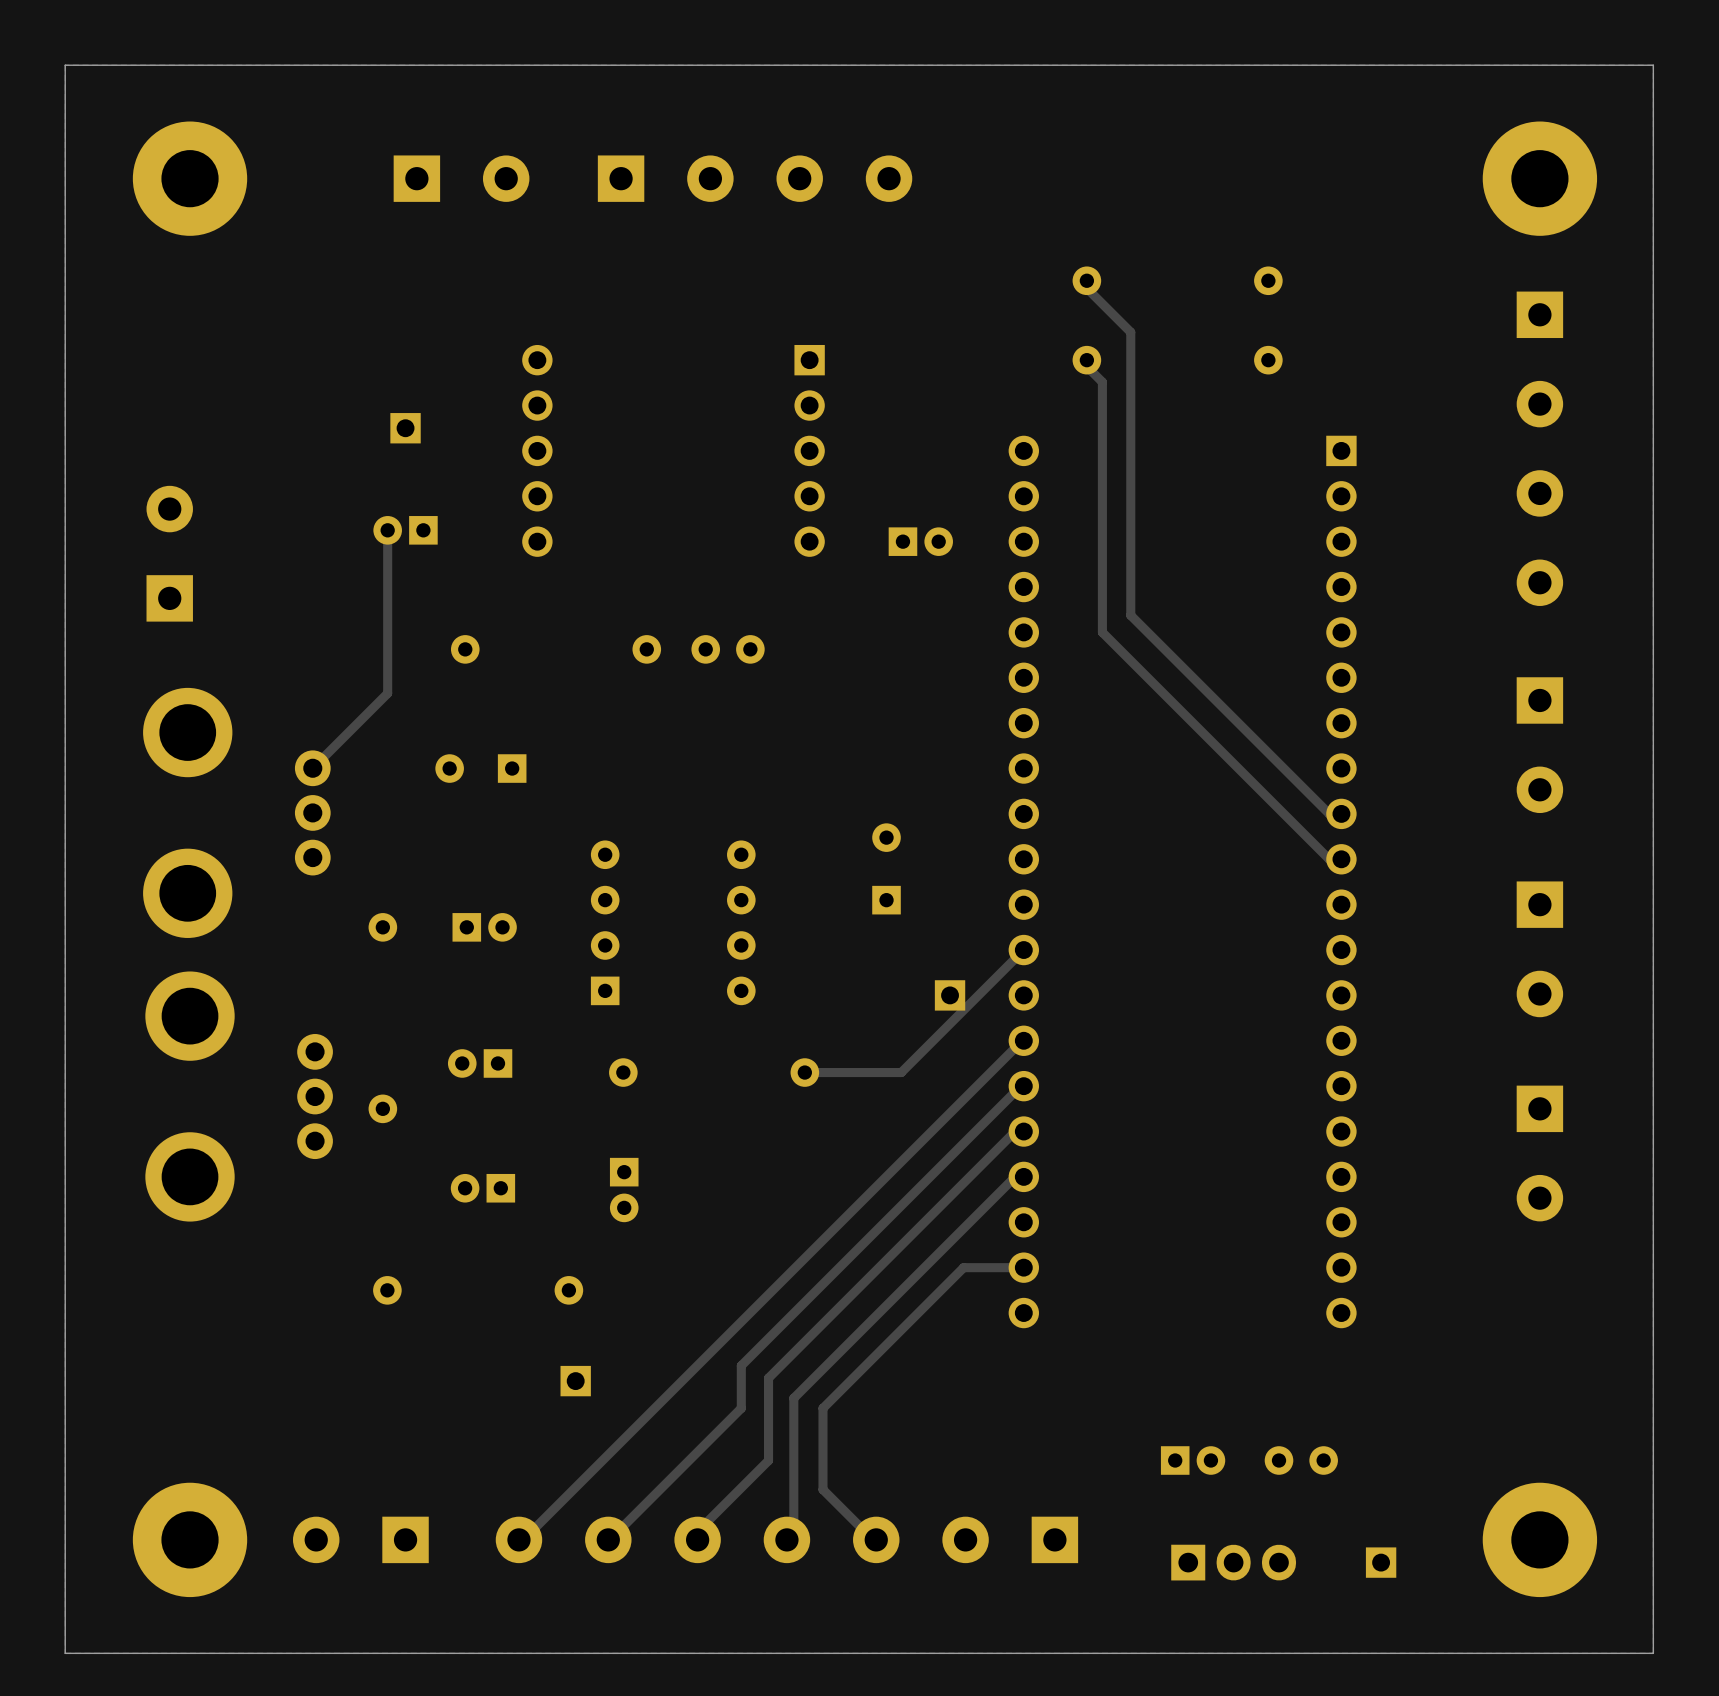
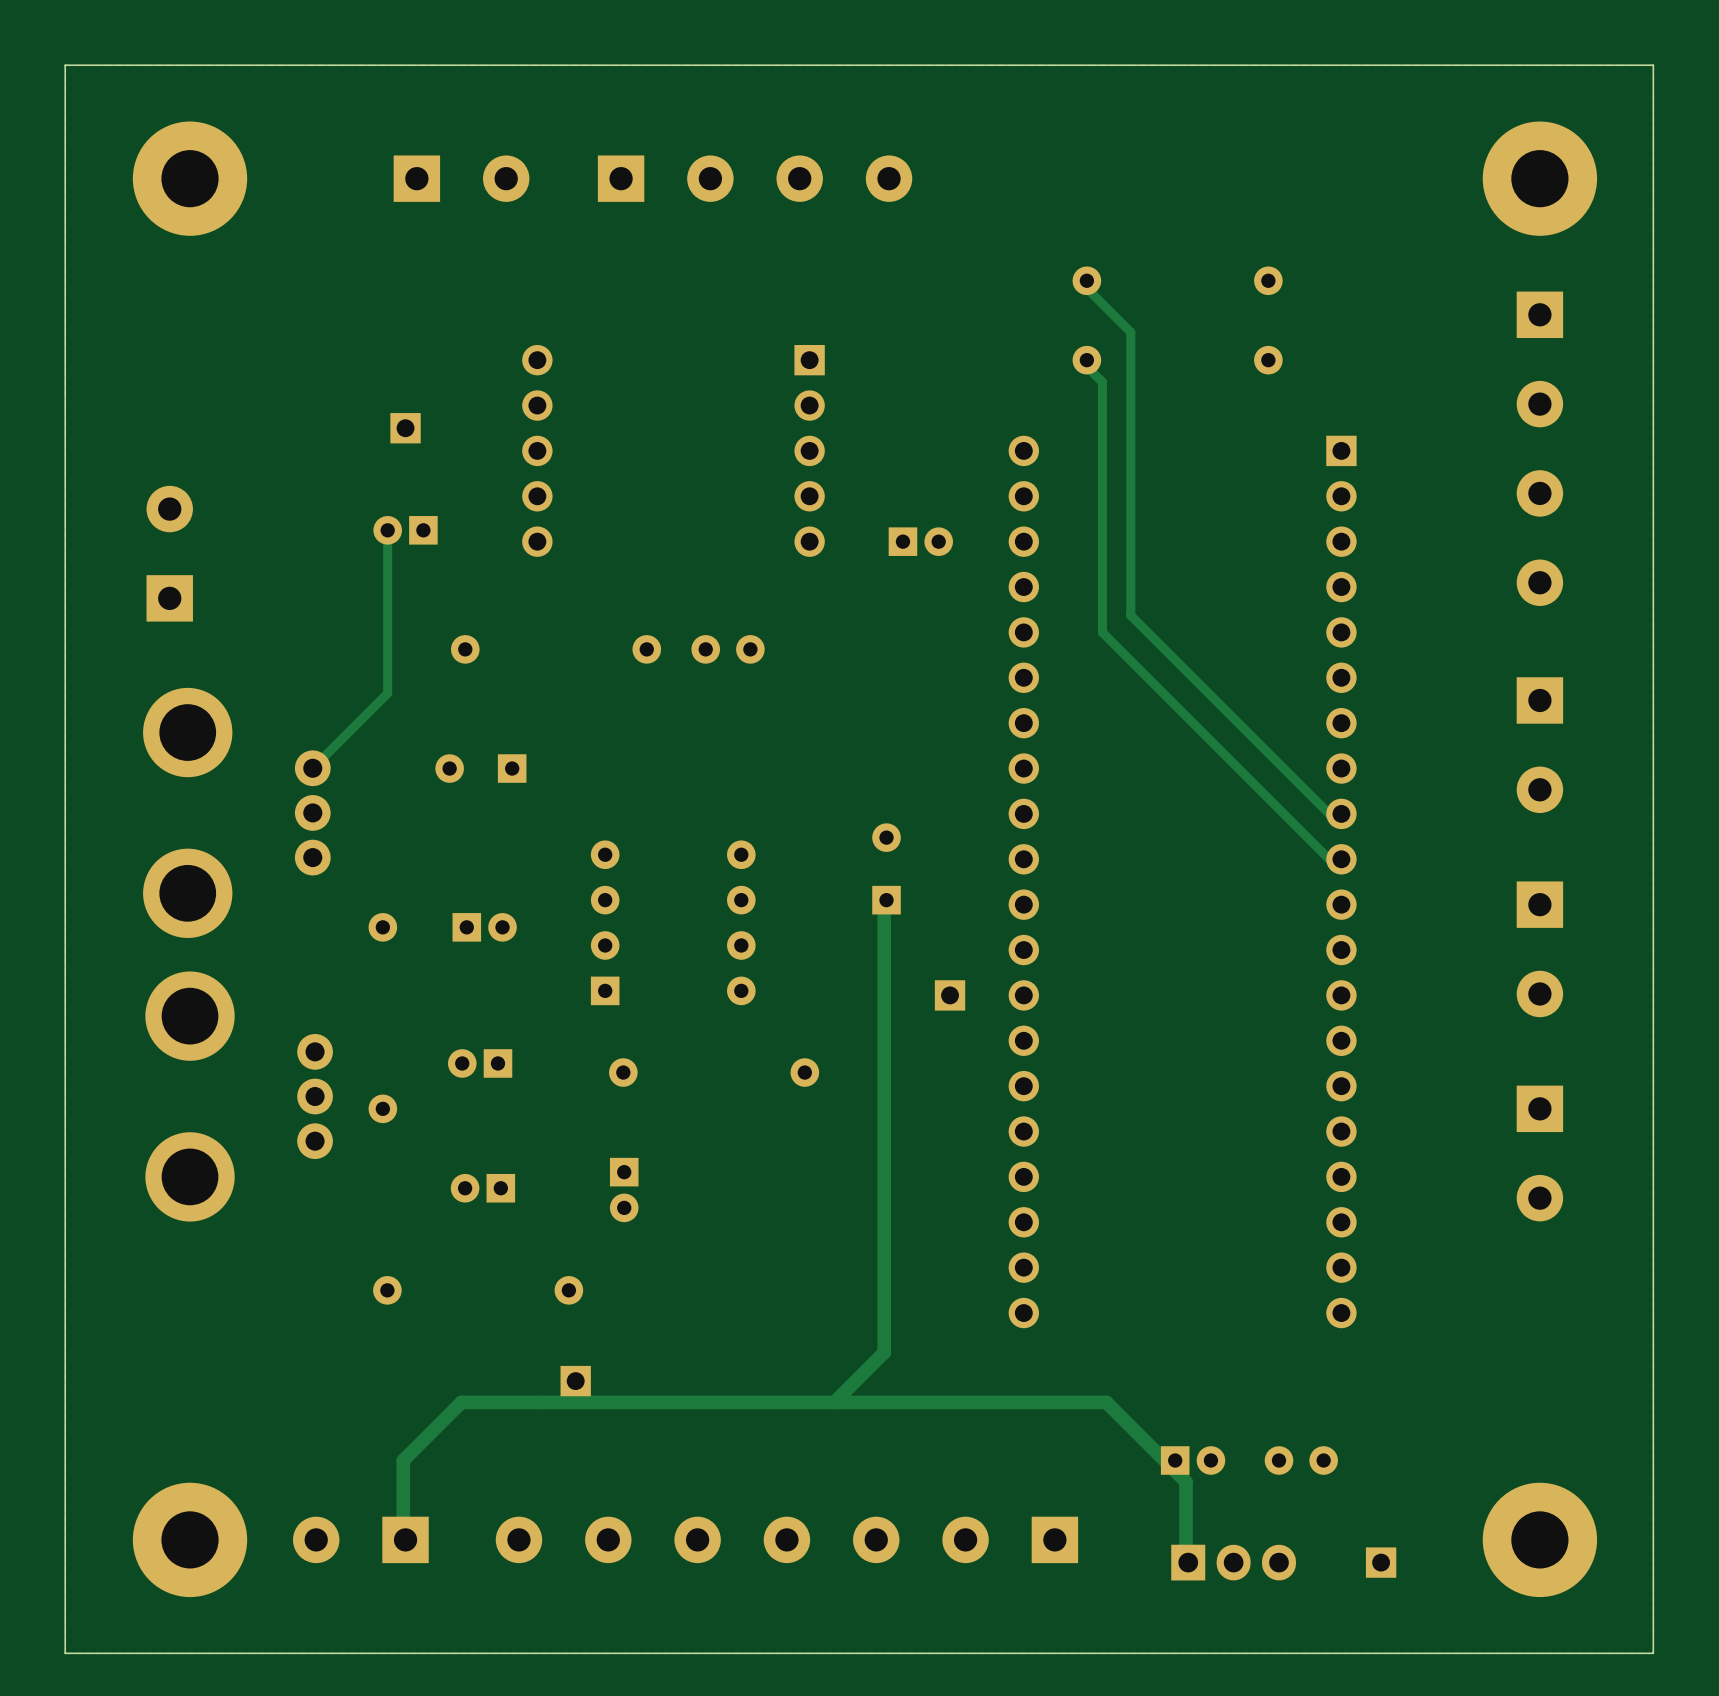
track: none -> (884, 900) (884, 1352) (834, 1402)
track: (1023, 950) (901, 1072) (804, 1072) -> none
track: (1020, 1040) (525, 1537) (513, 1537) -> none
track: (1020, 1086) (741, 1365) (741, 1408) (612, 1537) (602, 1537) -> none
track: (1020, 1131) (1015, 1131) (768, 1378) (768, 1460) (691, 1537) -> none
track: (1020, 1176) (1015, 1176) (793, 1398) (793, 1524) (781, 1537) -> none
track: (1020, 1267) (963, 1267) (822, 1408) (822, 1489) (870, 1537) -> none
track: none -> (403, 1539) (403, 1460) (461, 1402) (1106, 1402) (1185, 1481) (1185, 1562)

